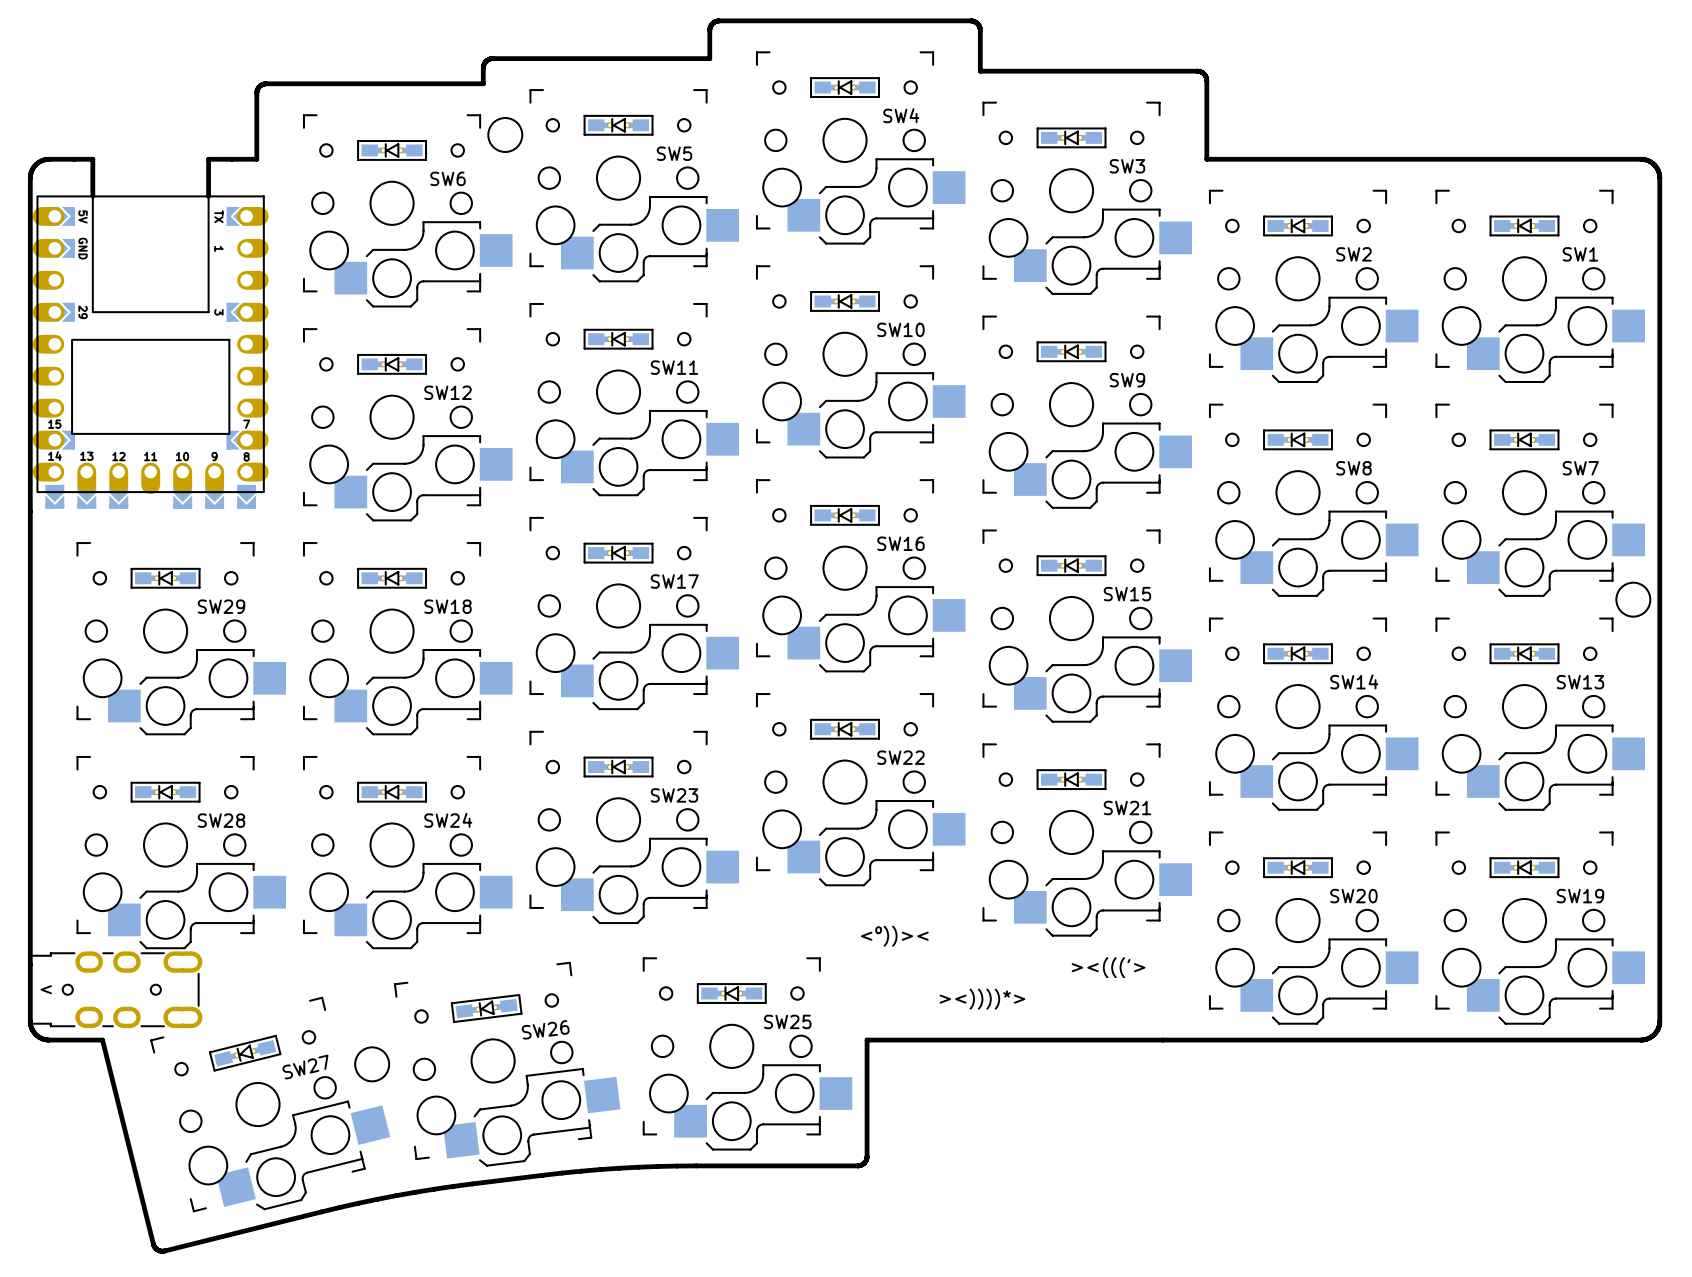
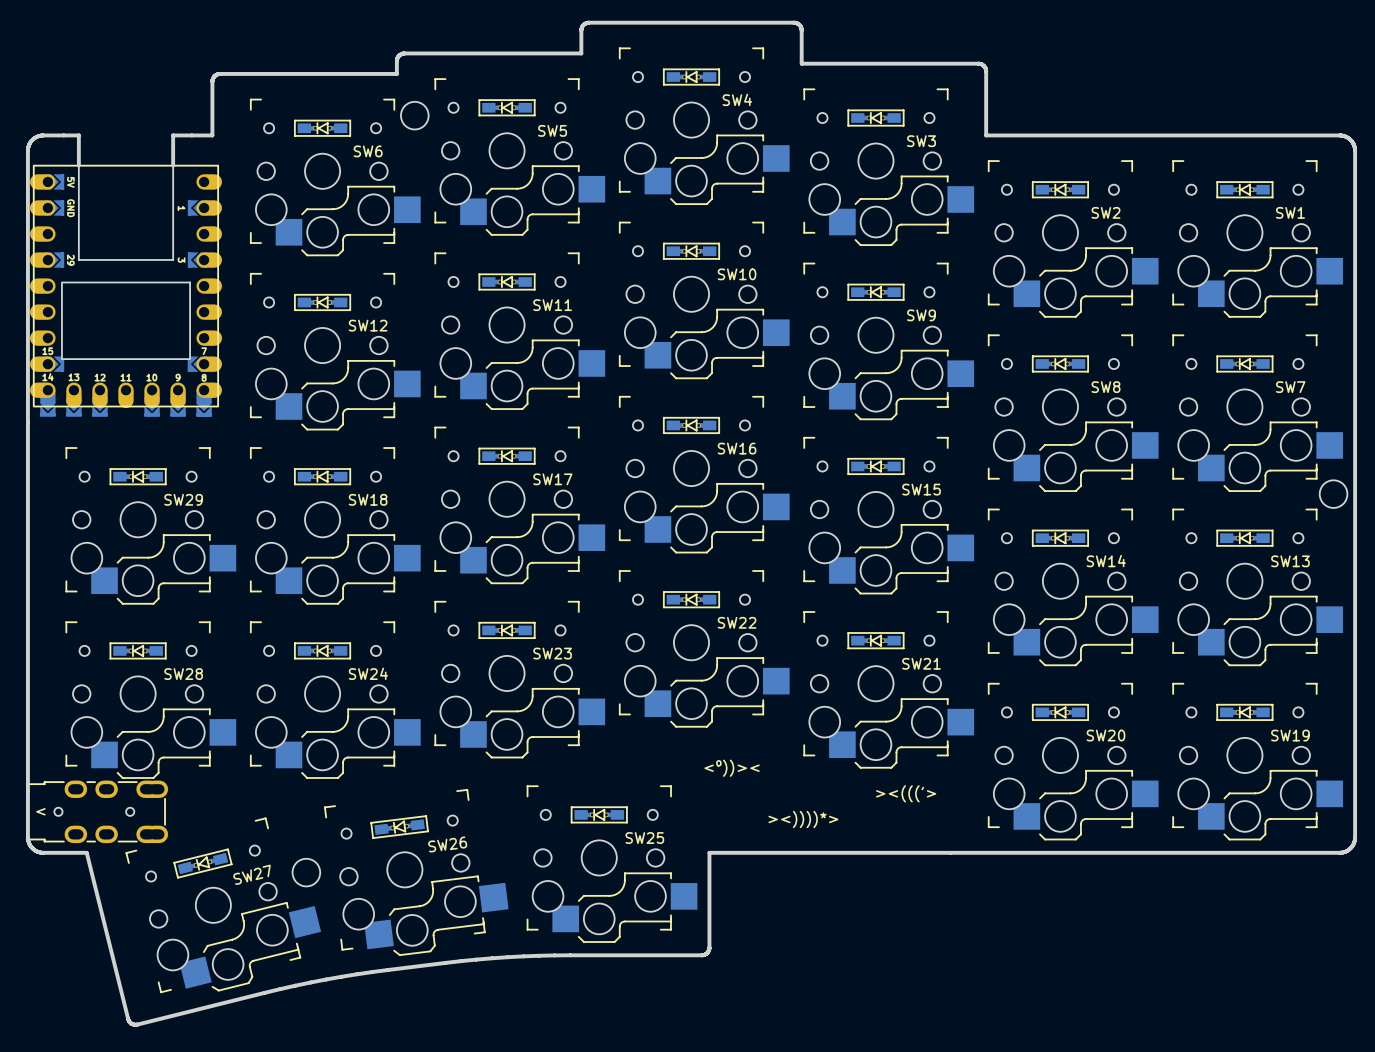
part footprint: [32, 195, 269, 509] -> [29, 164, 223, 417]

